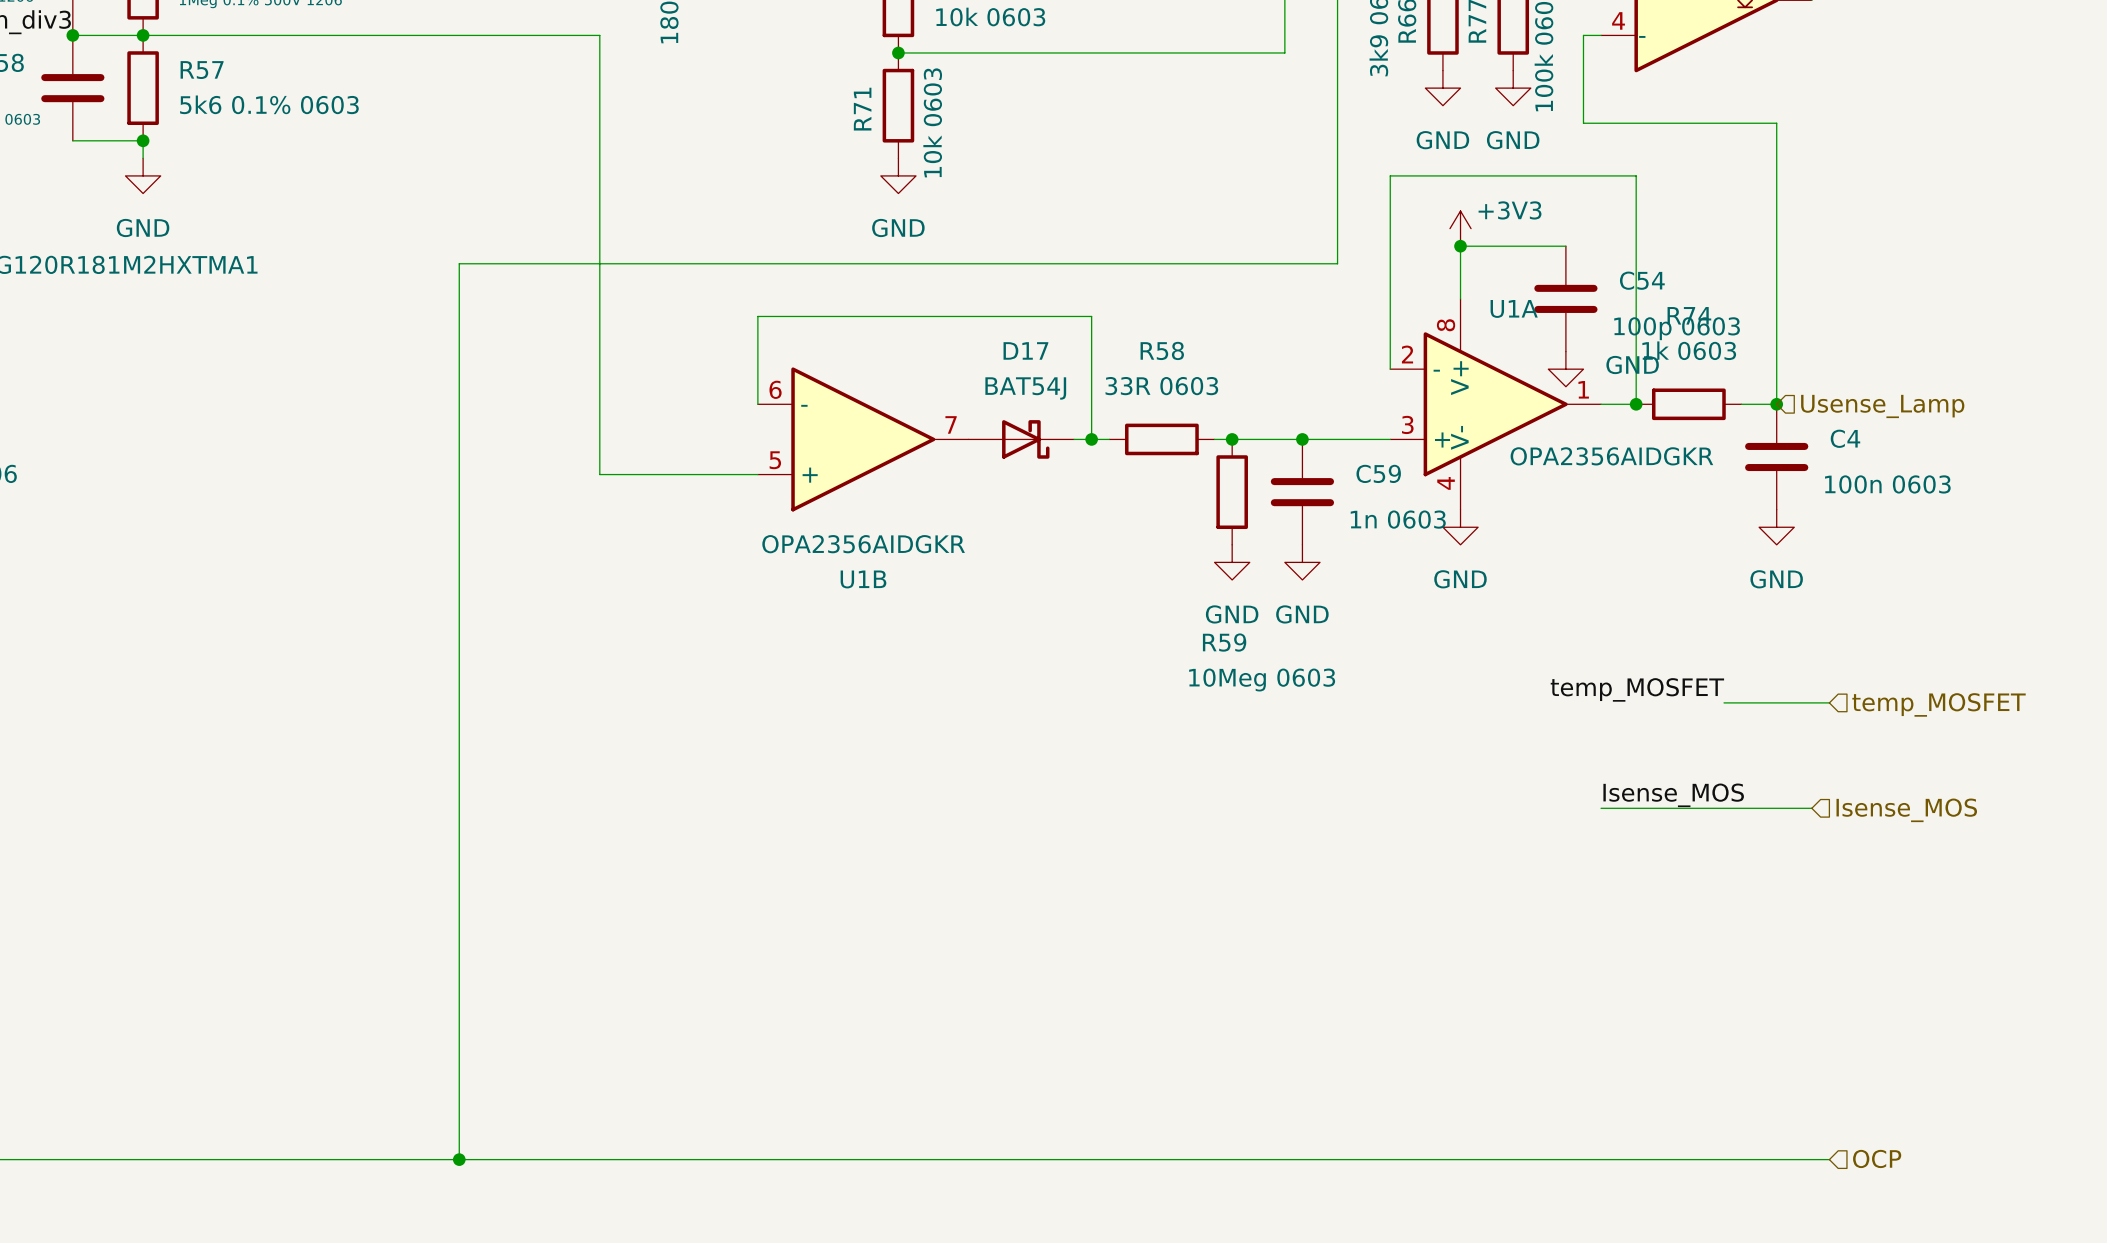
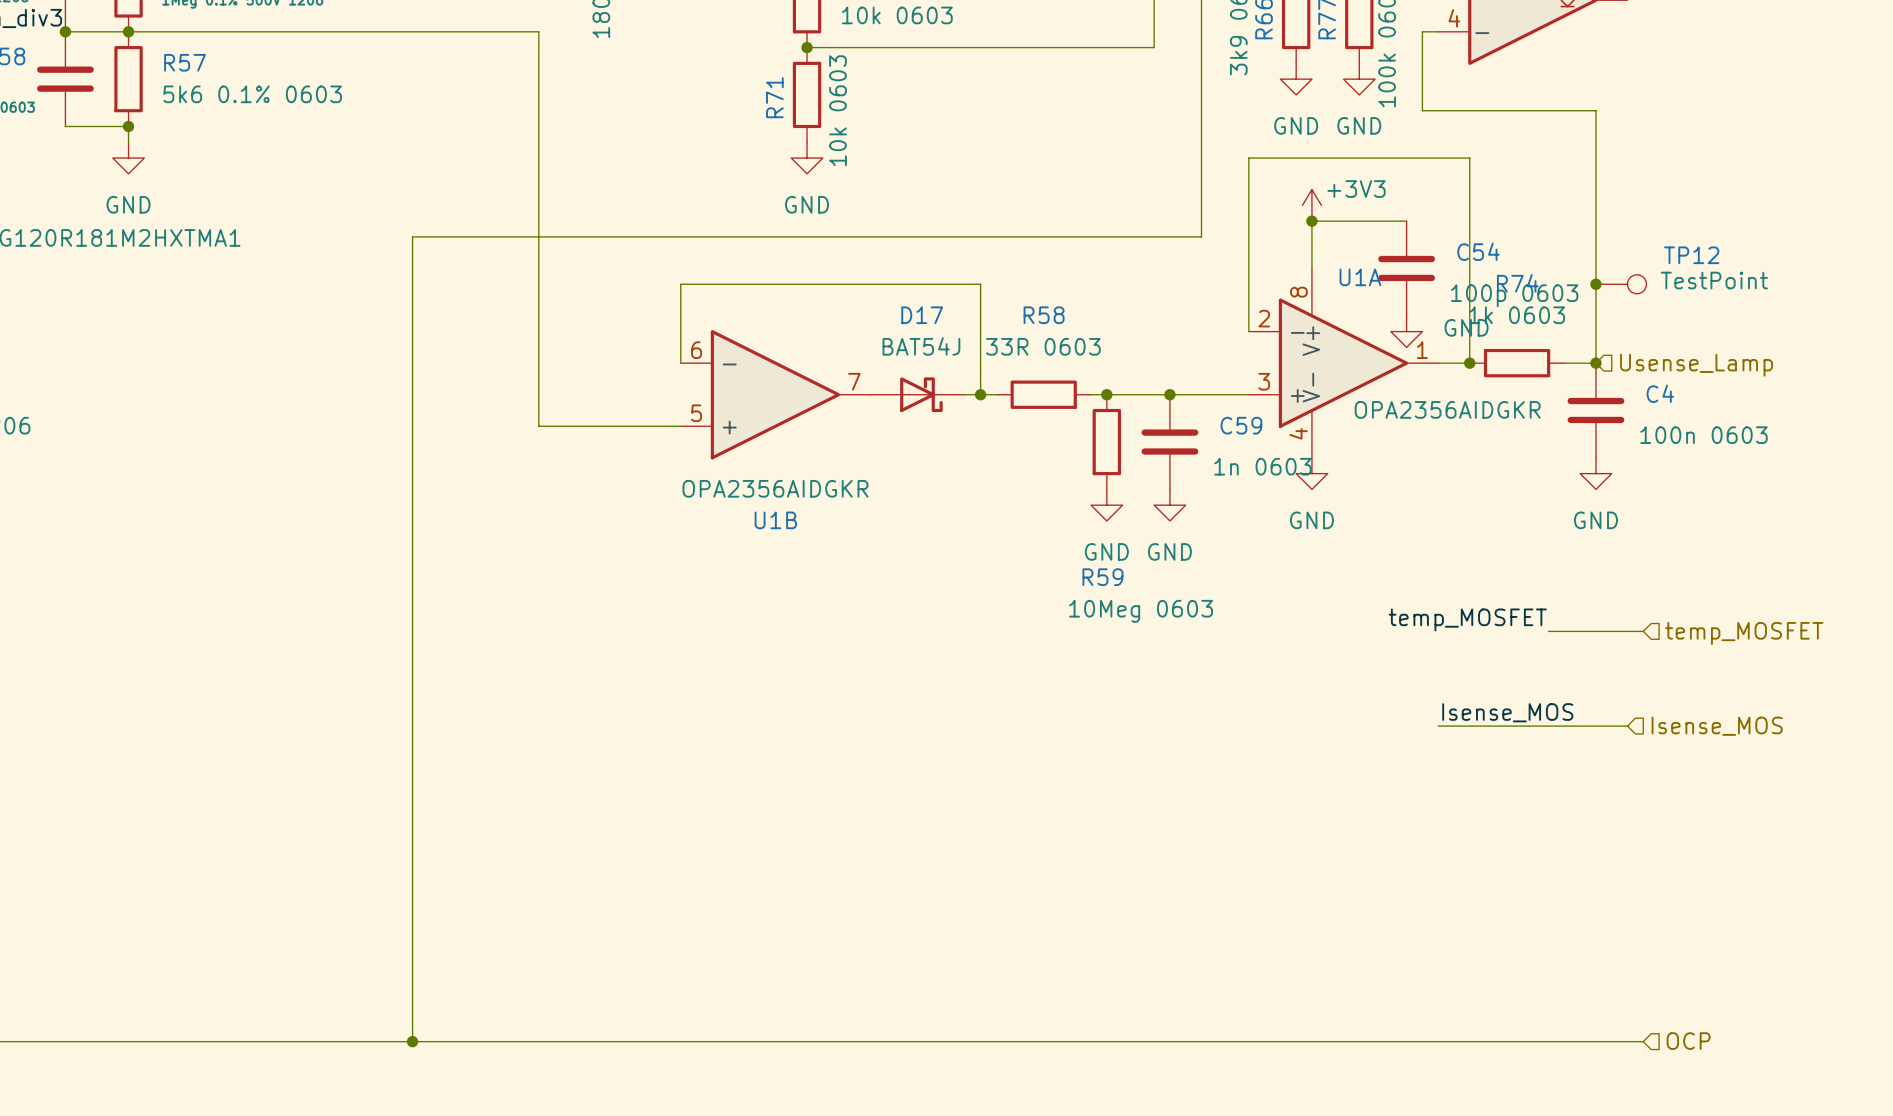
junction: none -> (1595, 284)
TP12: none -> TestPoint (1621, 284)

